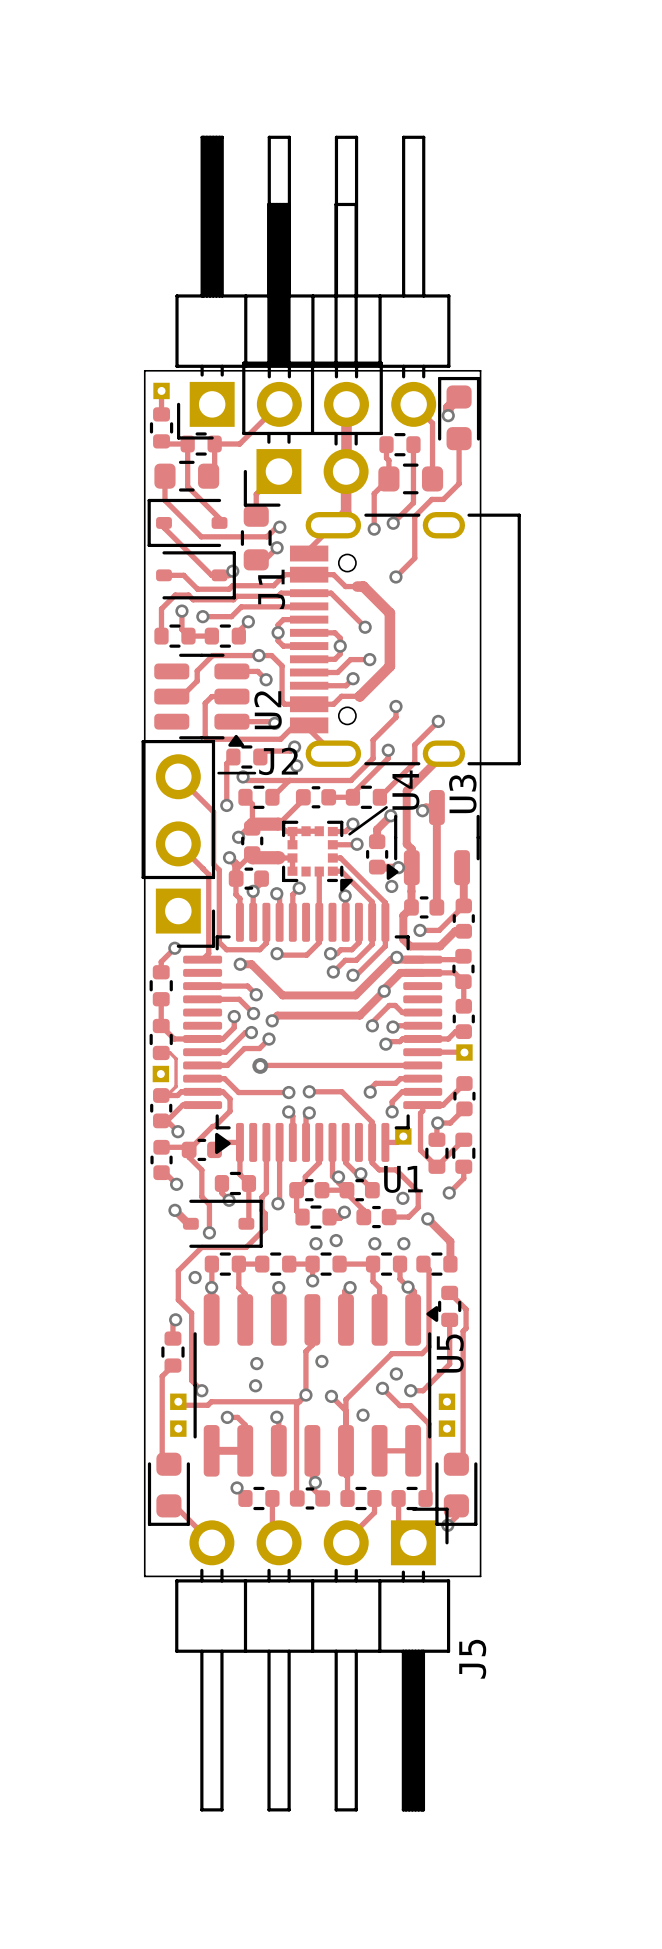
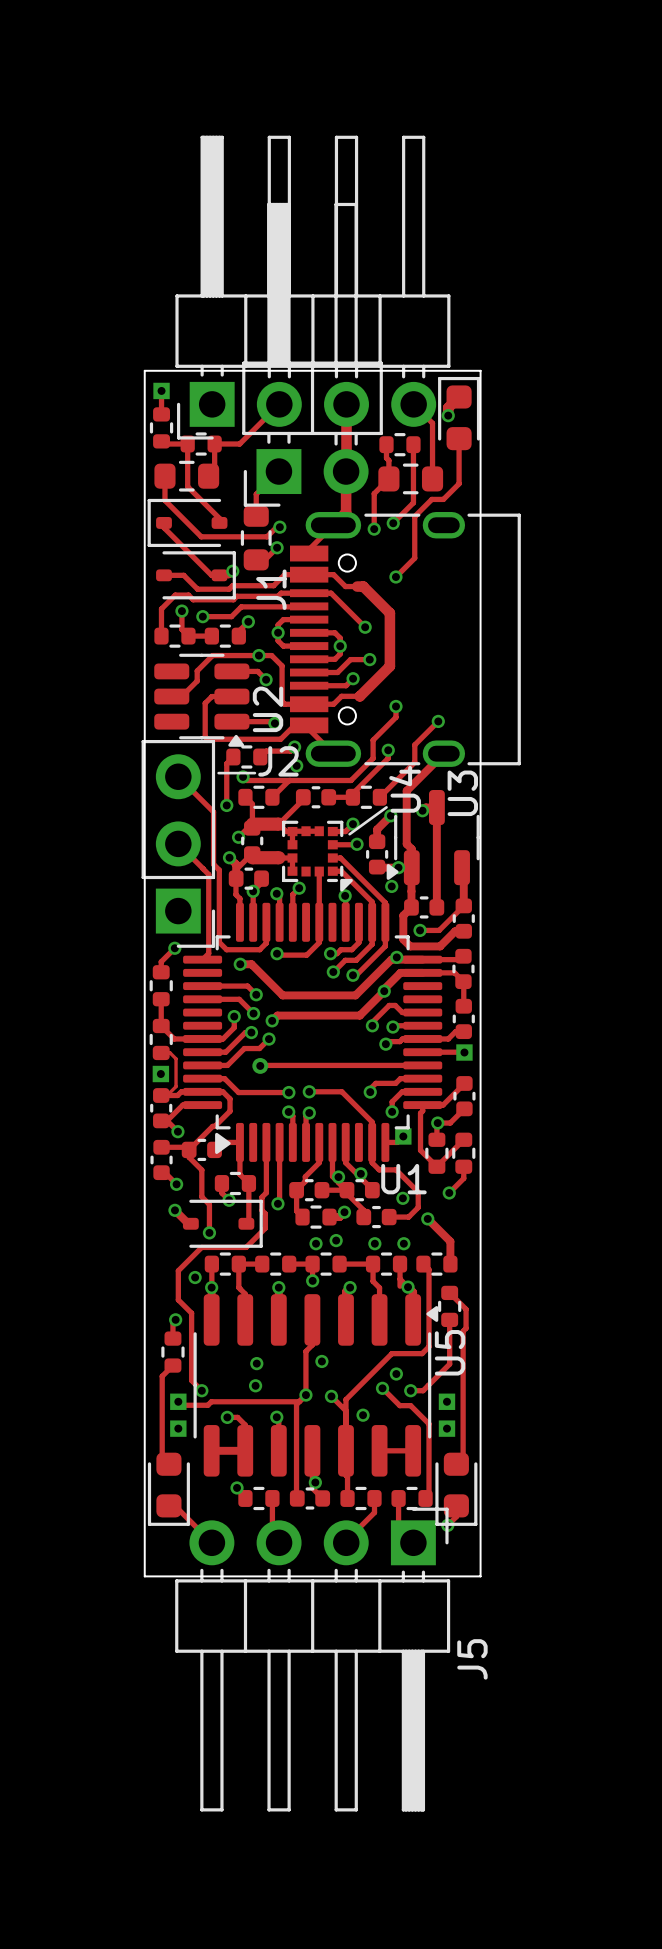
track: none -> (400, 1279) (400, 1286)

